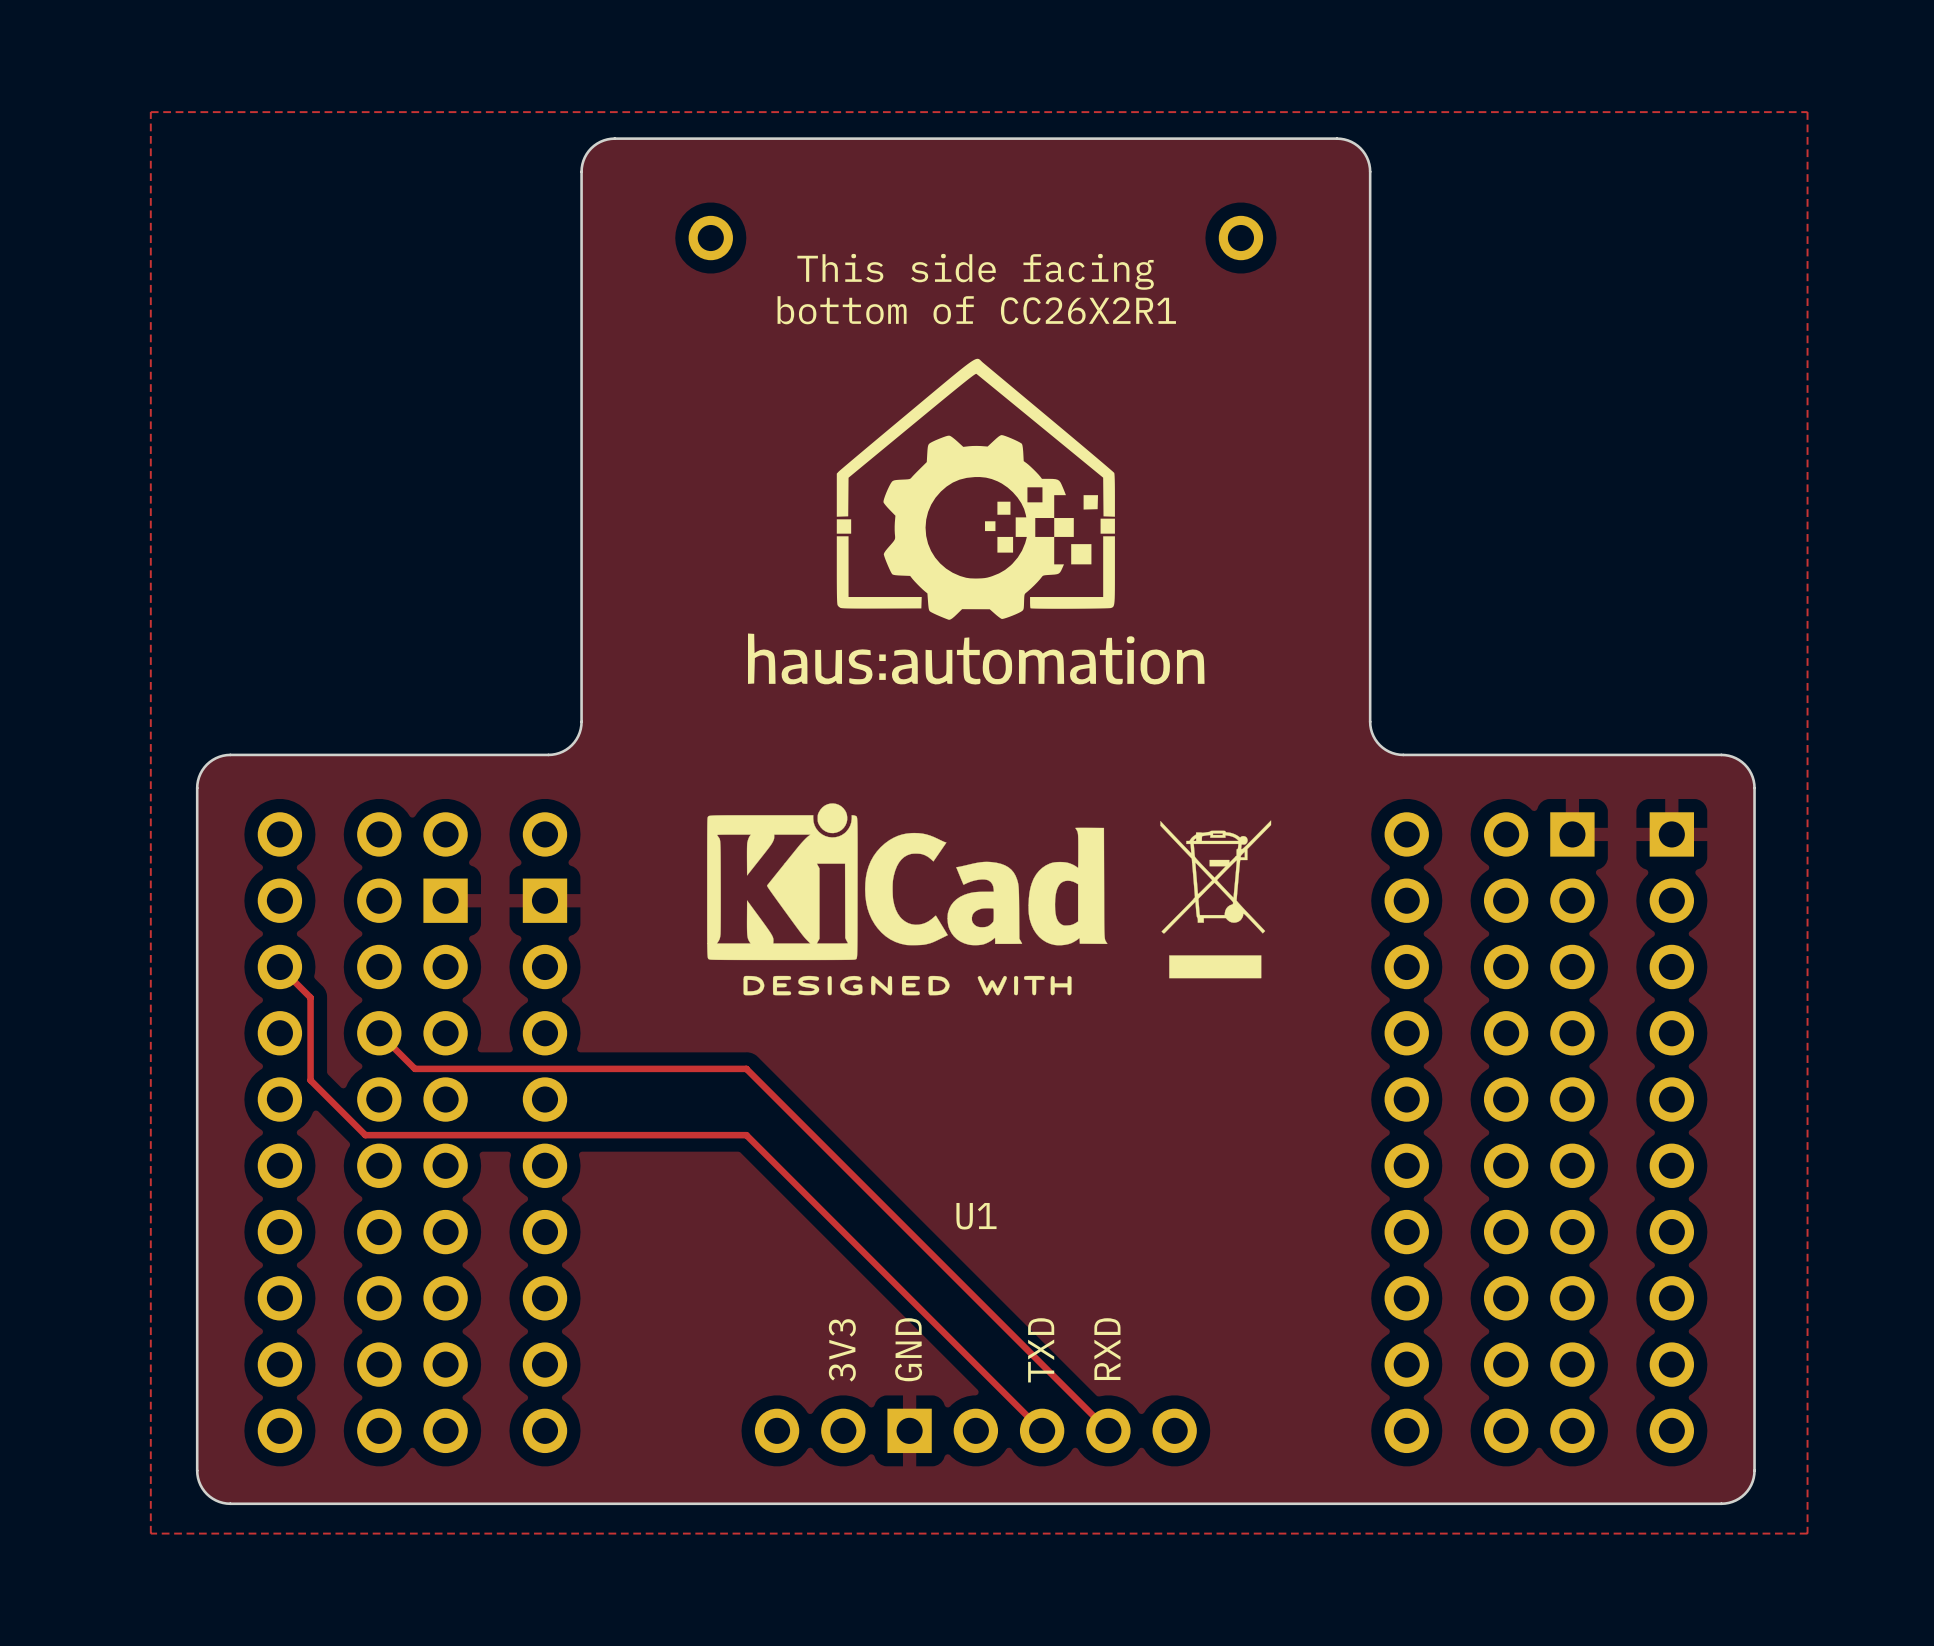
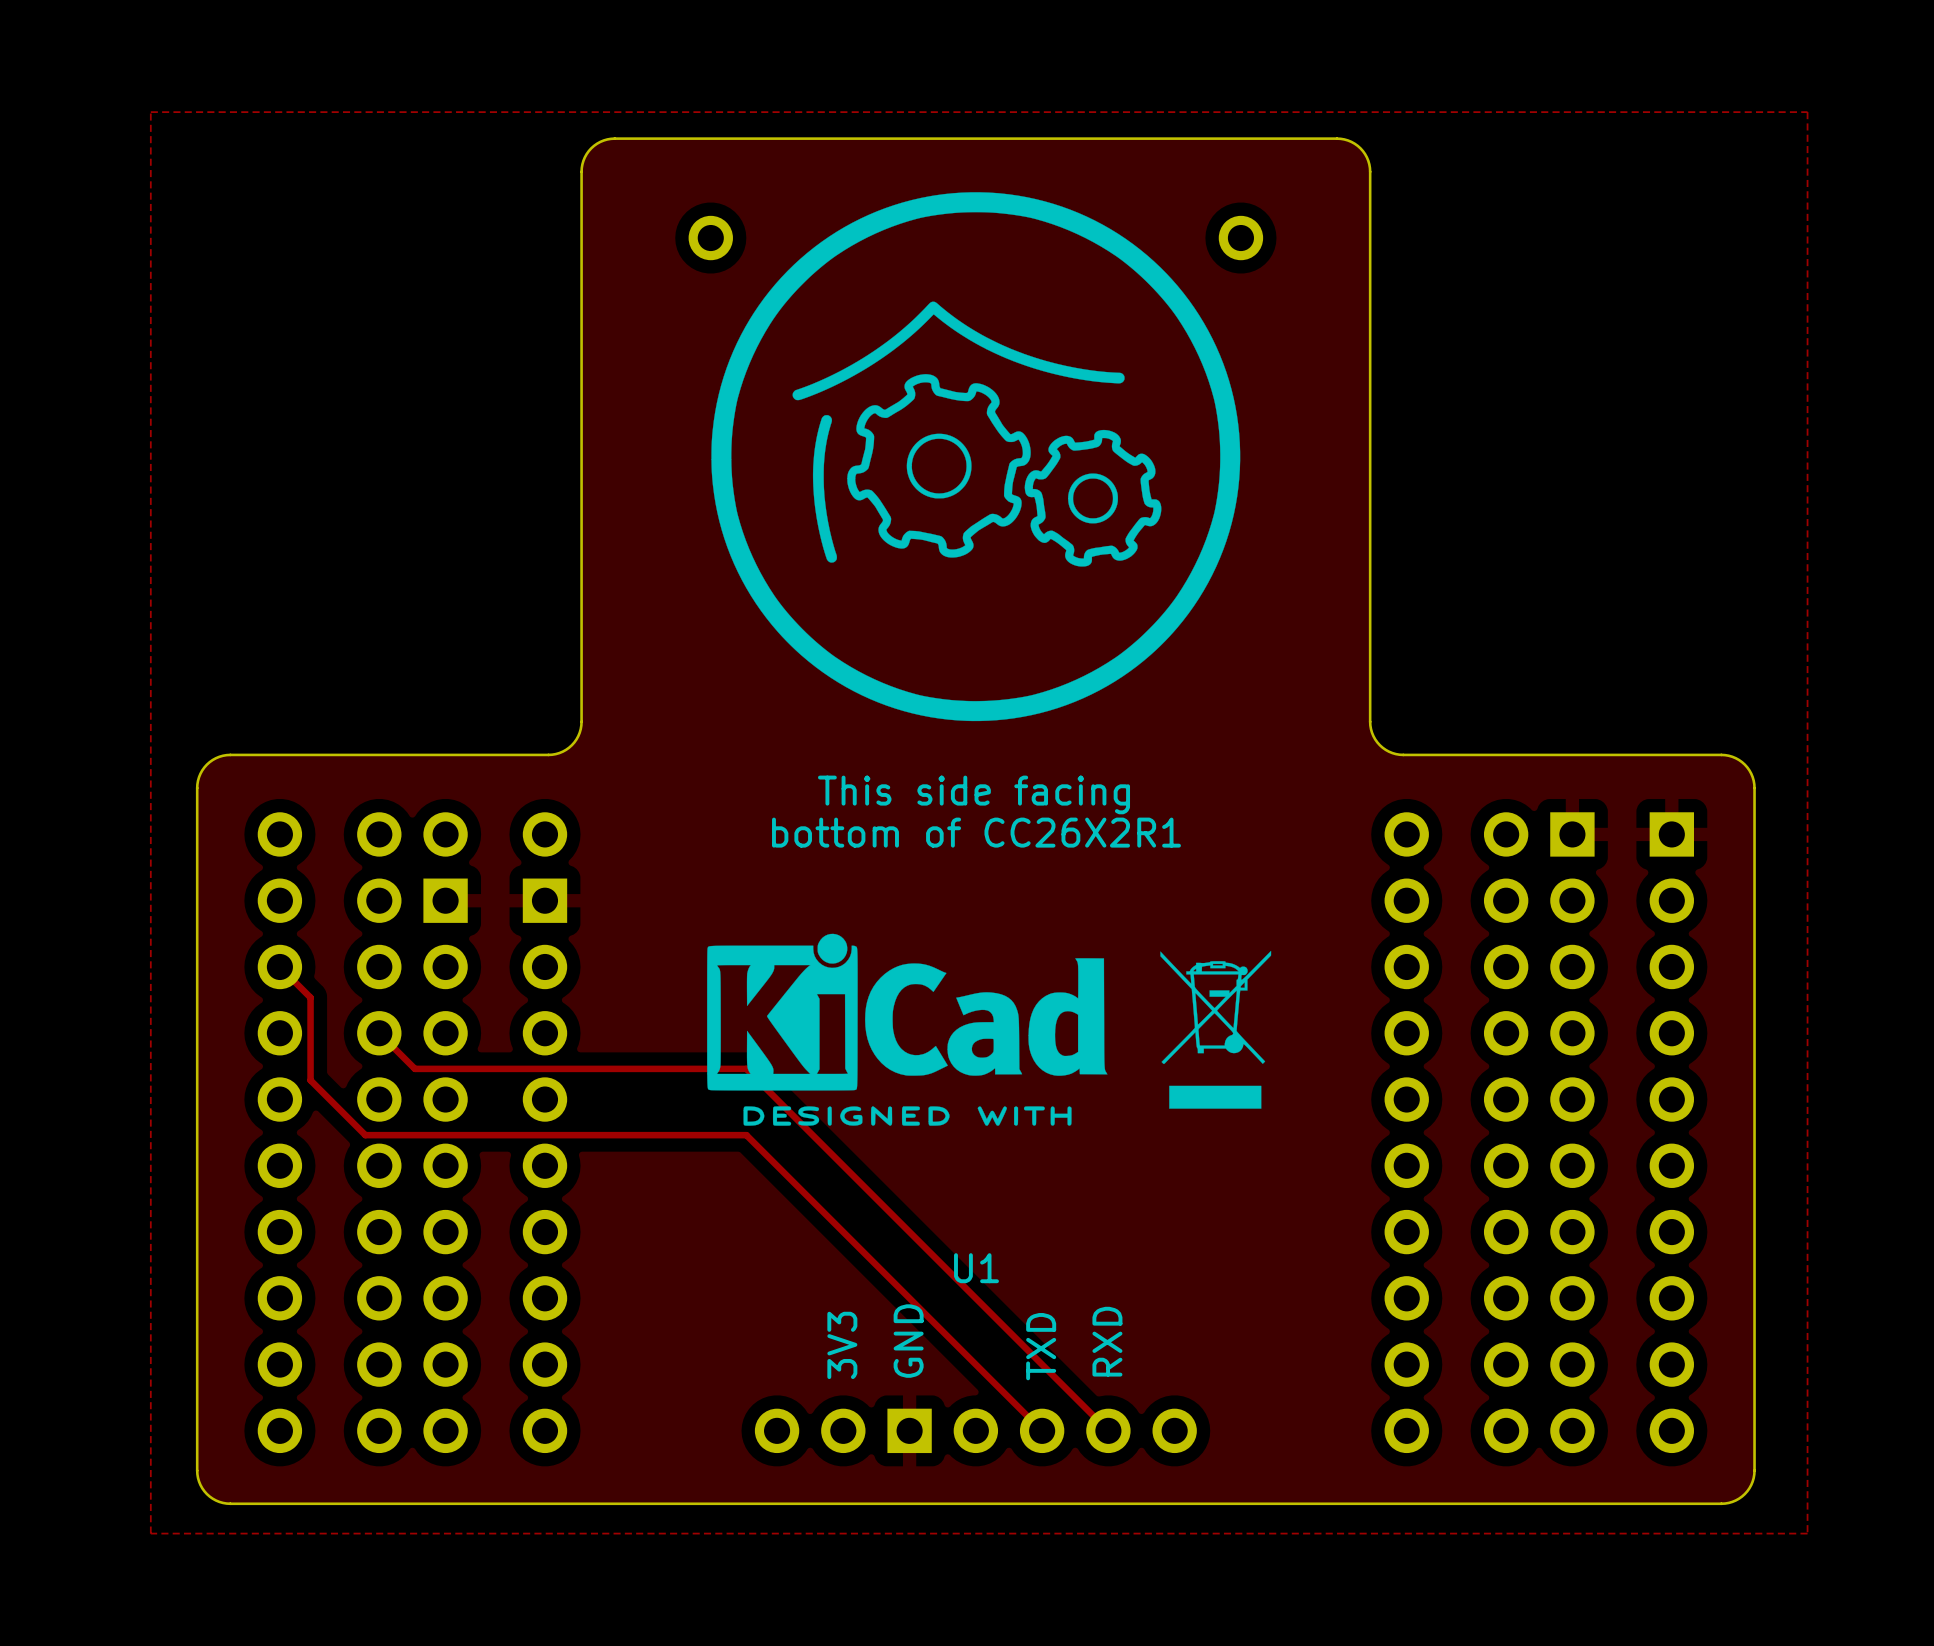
drawing: none -> [711, 192, 1241, 722]
text position: This side facing (975, 271) -> This side facing (974, 794)
text position: bottom of CC26X2R1 (976, 310) -> bottom of CC26X2R1 (976, 832)
drawing: [748, 358, 1205, 685] -> none
drawing position: (907, 899) -> (907, 1029)
drawing position: (1215, 899) -> (1215, 1029)
U1 name position: U1 (976, 1216) -> U1 (976, 1268)

